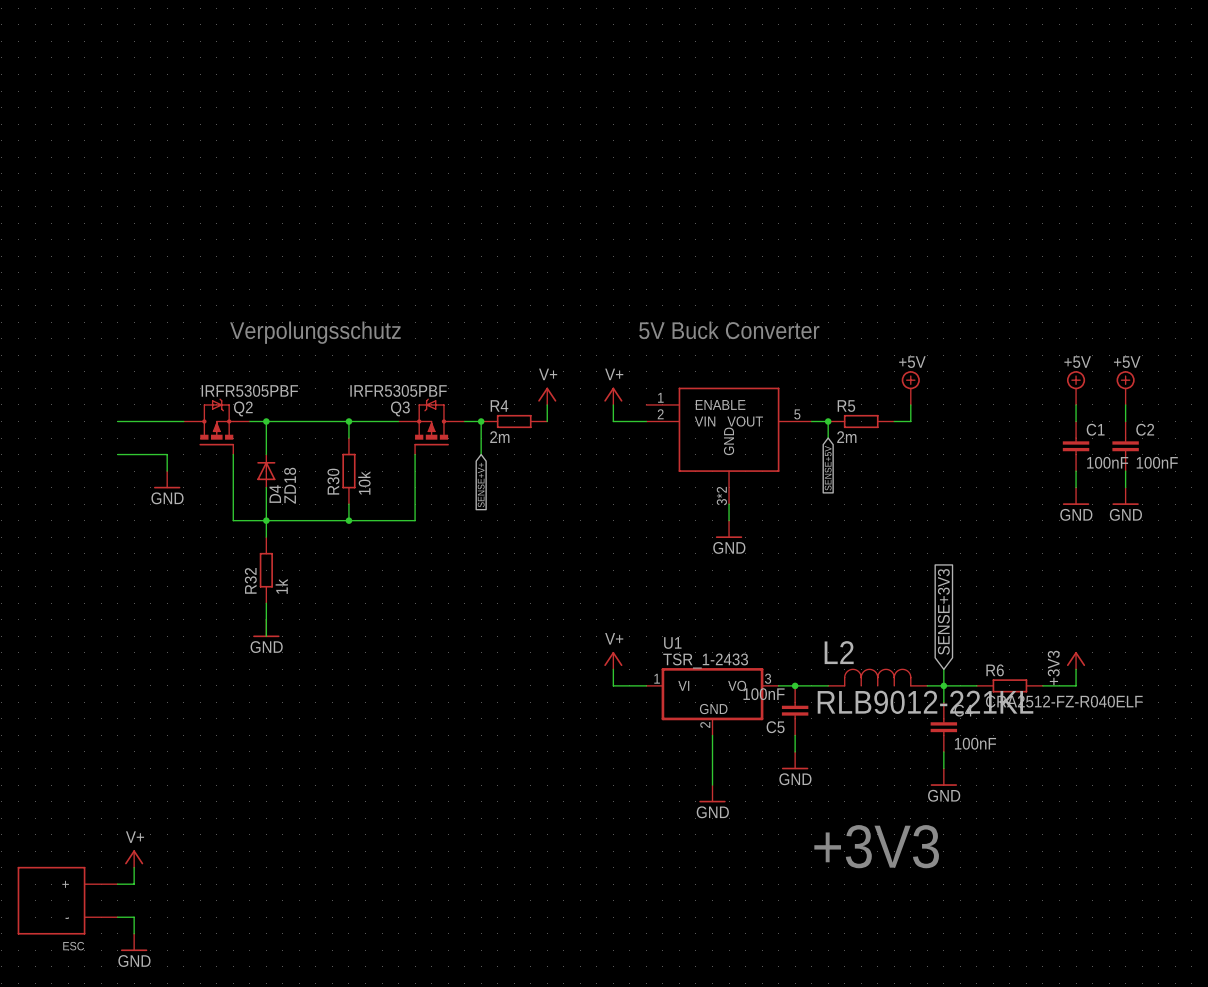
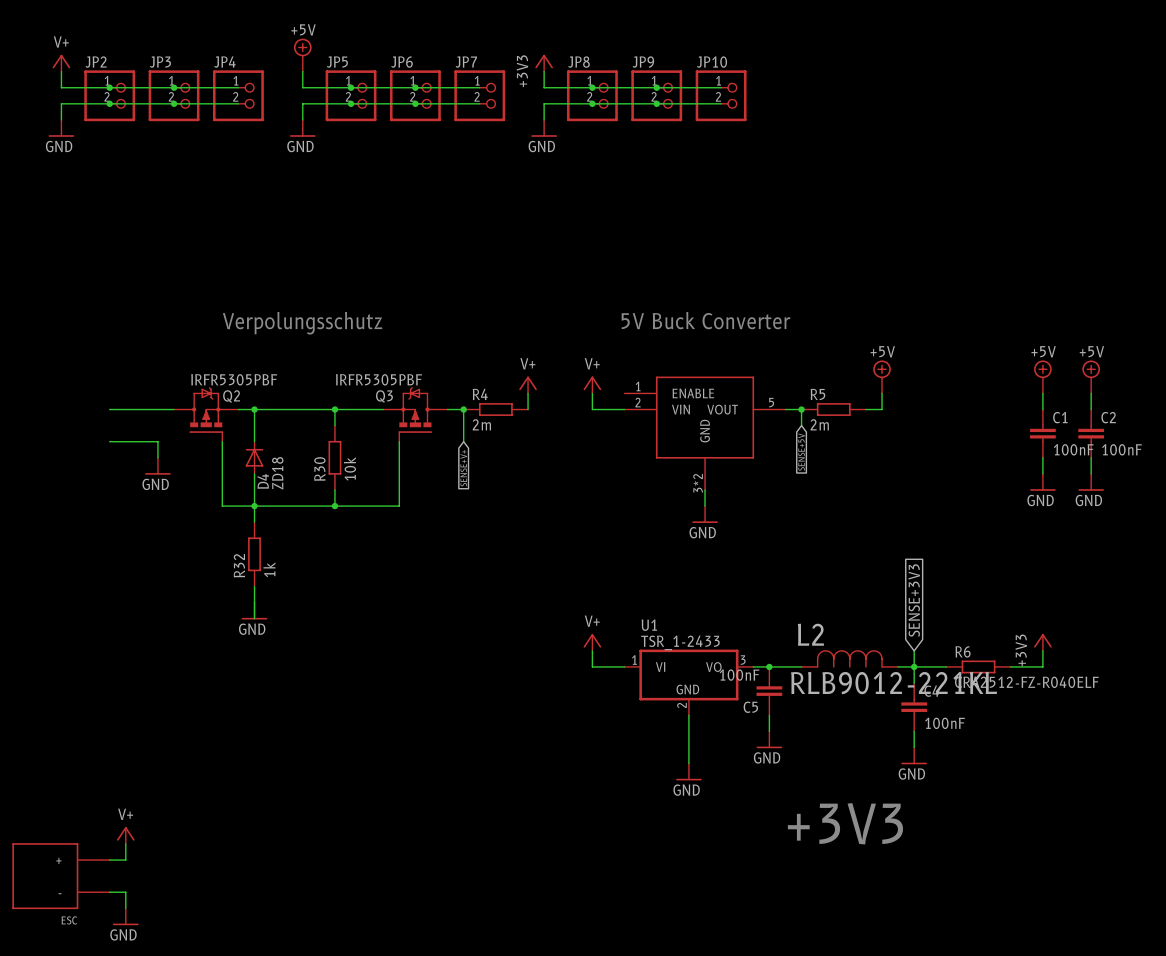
power symbol: none -> +5V (302, 55)
power symbol: none -> V+ (61, 63)
power symbol: none -> +3V3 (544, 63)
wire: none -> (61, 71) (61, 87) (238, 87)
wire: none -> (302, 71) (302, 87) (479, 87)
wire: none -> (544, 71) (544, 87) (721, 87)
junction: none -> (109, 87)
junction: none -> (174, 87)
junction: none -> (351, 87)
junction: none -> (415, 87)
junction: none -> (592, 87)
junction: none -> (656, 87)
JP2: none -> (109, 95)
JP3: none -> (174, 95)
JP4: none -> (238, 95)
JP5: none -> (351, 95)
JP6: none -> (415, 95)
JP7: none -> (479, 95)
JP8: none -> (592, 95)
JP9: none -> (656, 95)
JP10: none -> (721, 95)
junction: none -> (109, 103)
junction: none -> (174, 103)
wire: none -> (238, 103) (61, 103) (61, 119)
junction: none -> (351, 103)
junction: none -> (415, 103)
wire: none -> (479, 103) (302, 103) (302, 119)
junction: none -> (592, 103)
junction: none -> (656, 103)
wire: none -> (721, 103) (544, 103) (544, 119)
power symbol: none -> GND (61, 128)
power symbol: none -> GND (302, 128)
power symbol: none -> GND (544, 128)

